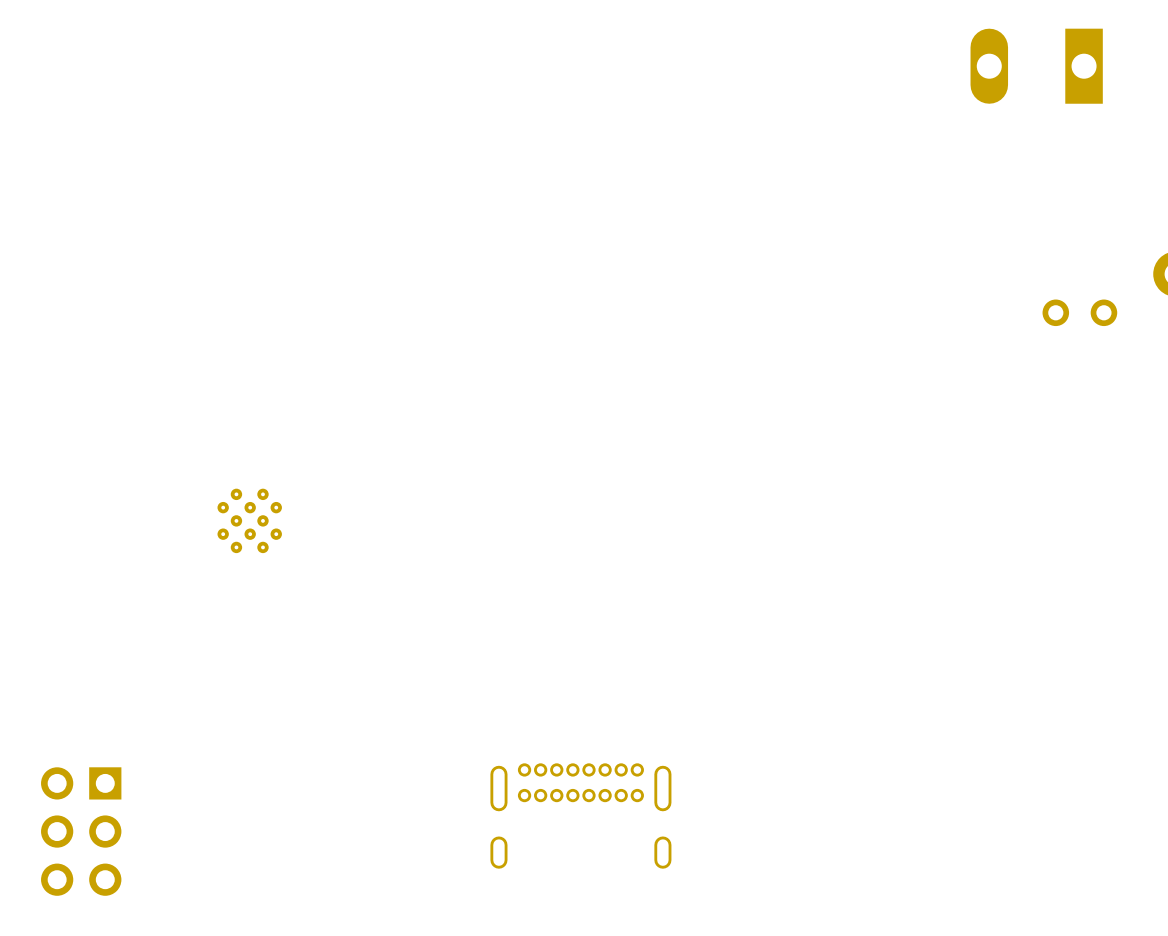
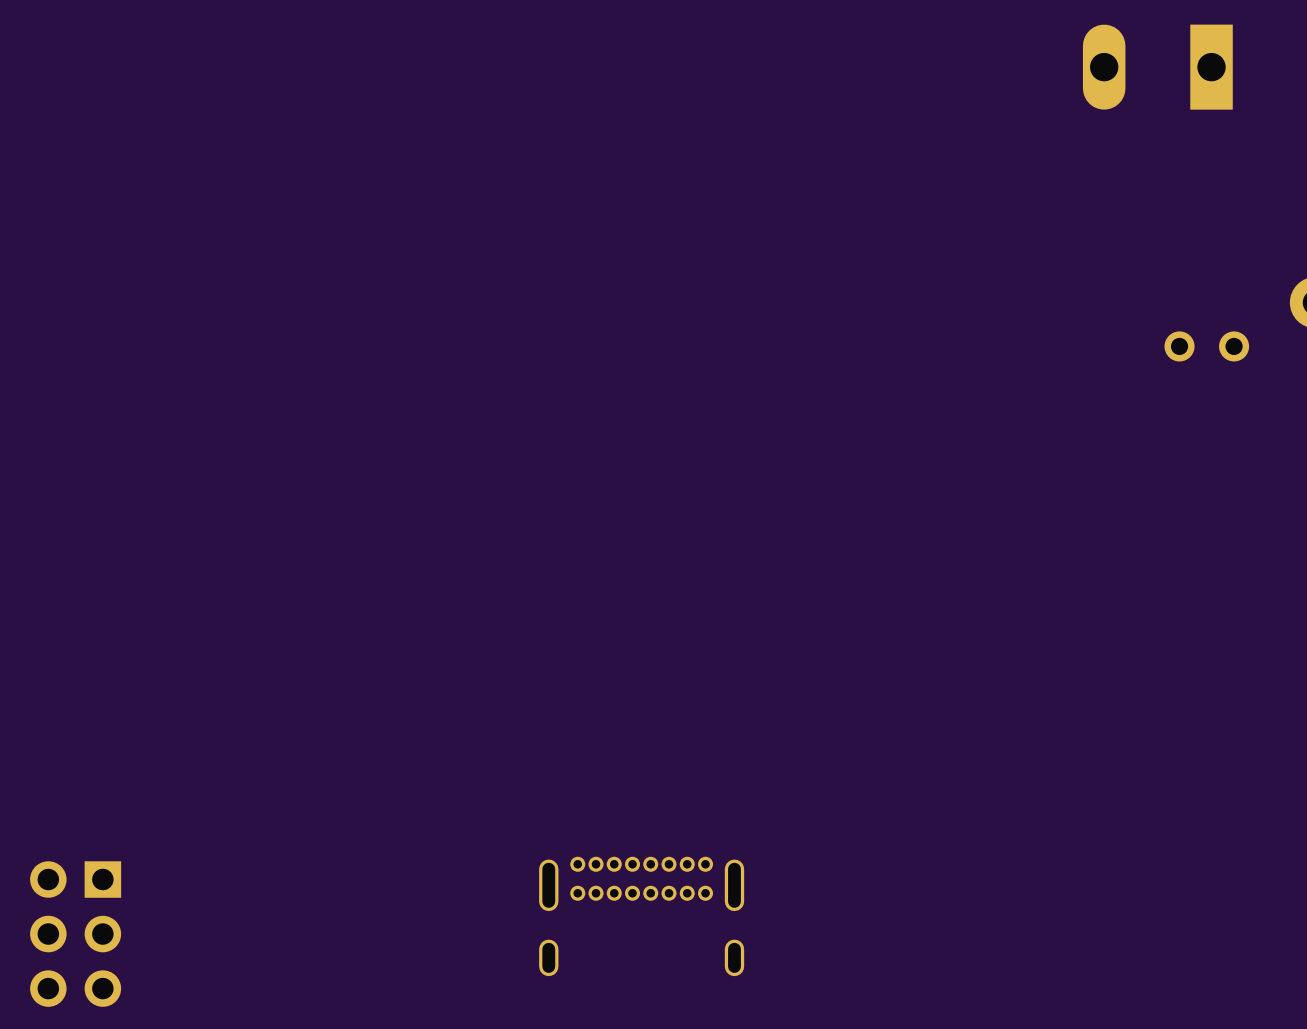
part: (249, 520) -> none

